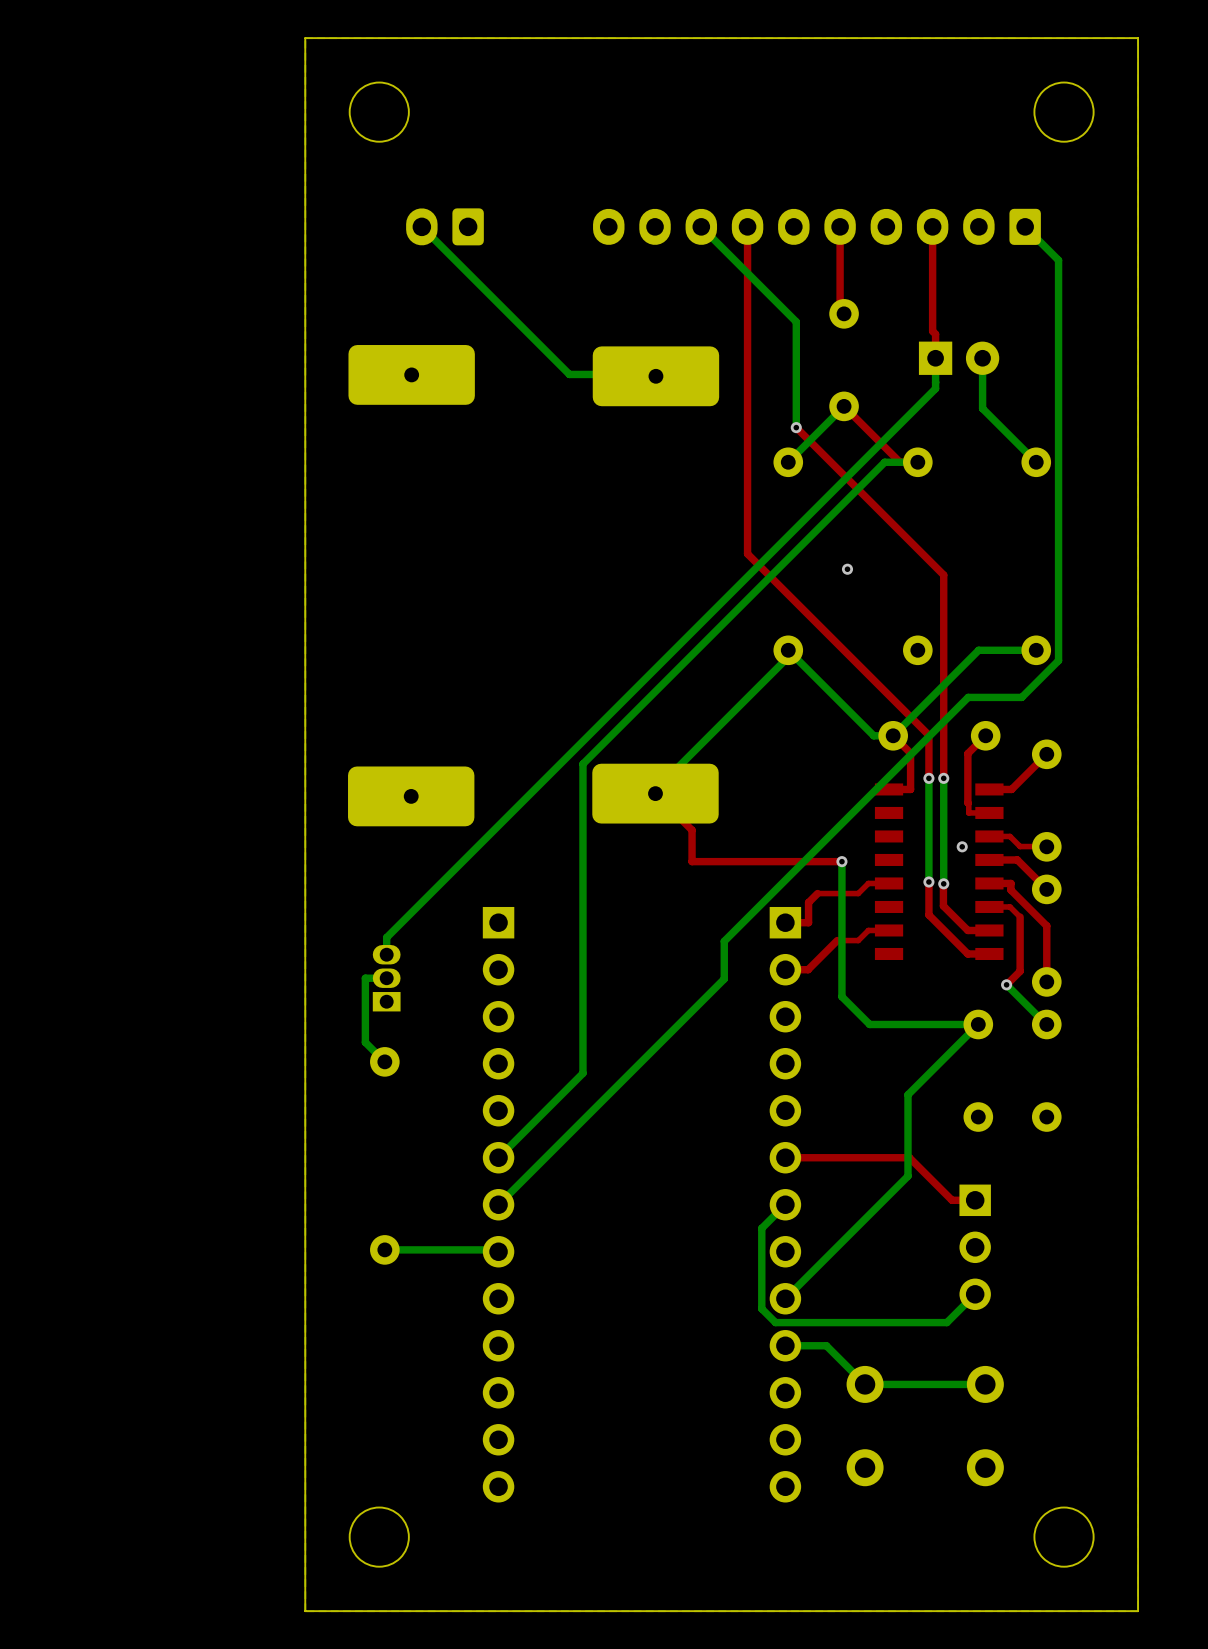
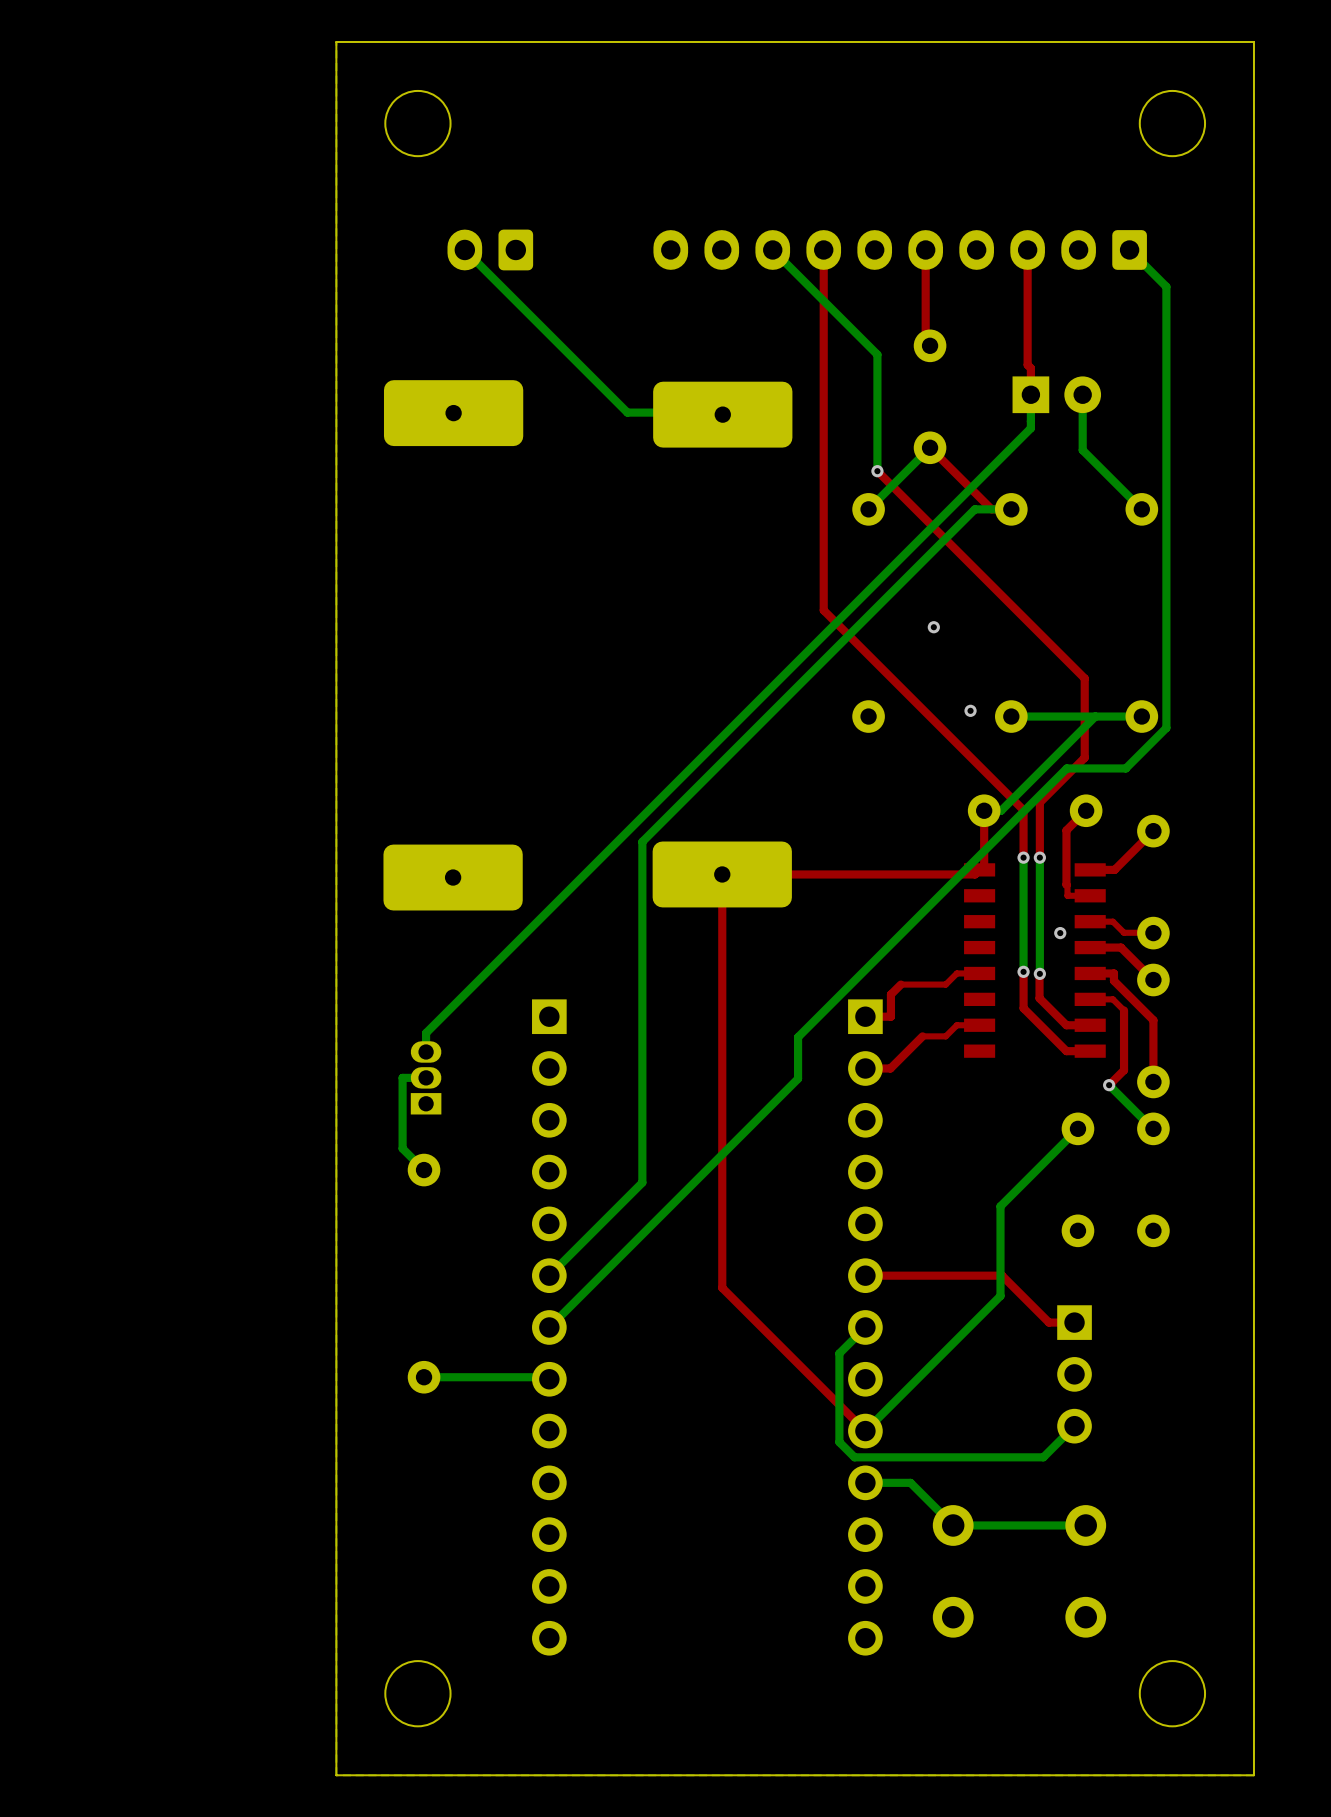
top track: (943, 575) (943, 728) -> (1039, 633) (1084, 678) (1084, 757) (1039, 802)
via: none -> (970, 710)
bottom track: (978, 650) (893, 735) (873, 735) (791, 653) (653, 791) -> (1078, 716) (1011, 716)
bottom track: none -> (1095, 716) (1001, 810) (984, 810)
top track: (893, 735) (910, 753) (910, 789) (889, 789) -> (984, 810) (984, 865) (975, 874) (722, 874) (722, 1287) (865, 1431)
top track: (655, 793) (692, 830) (692, 861) (841, 861) -> none
bottom track: (841, 861) (841, 996) (869, 1024) (978, 1024) -> none
via: (841, 861) -> none

